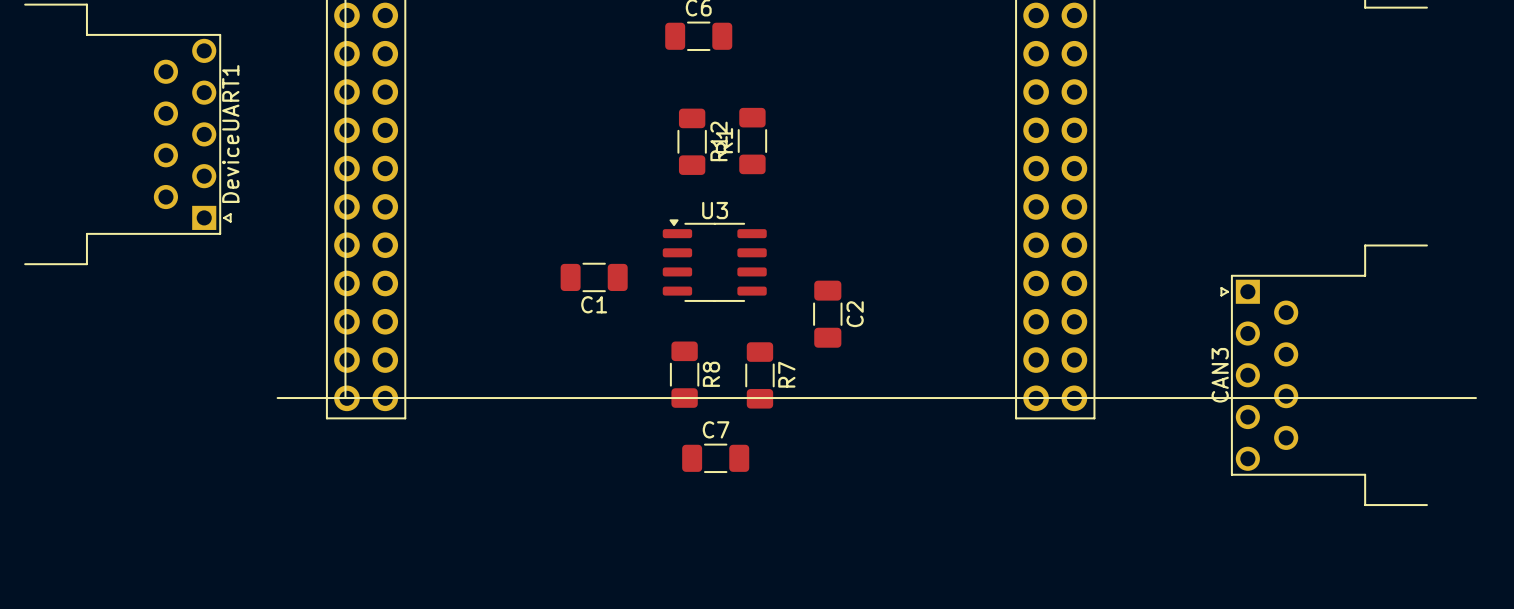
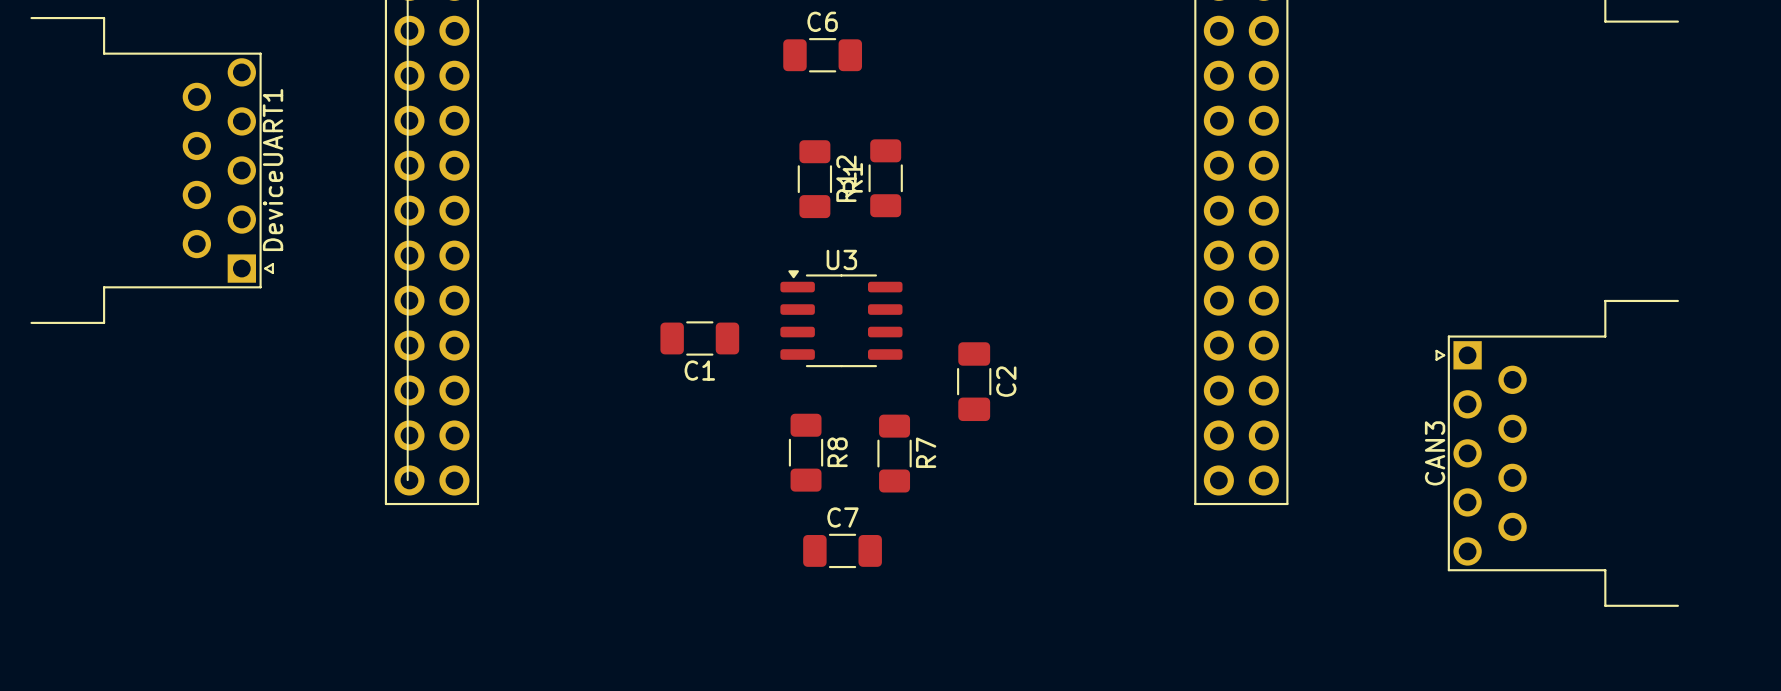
line: (277, 398) (1475, 398) -> none

